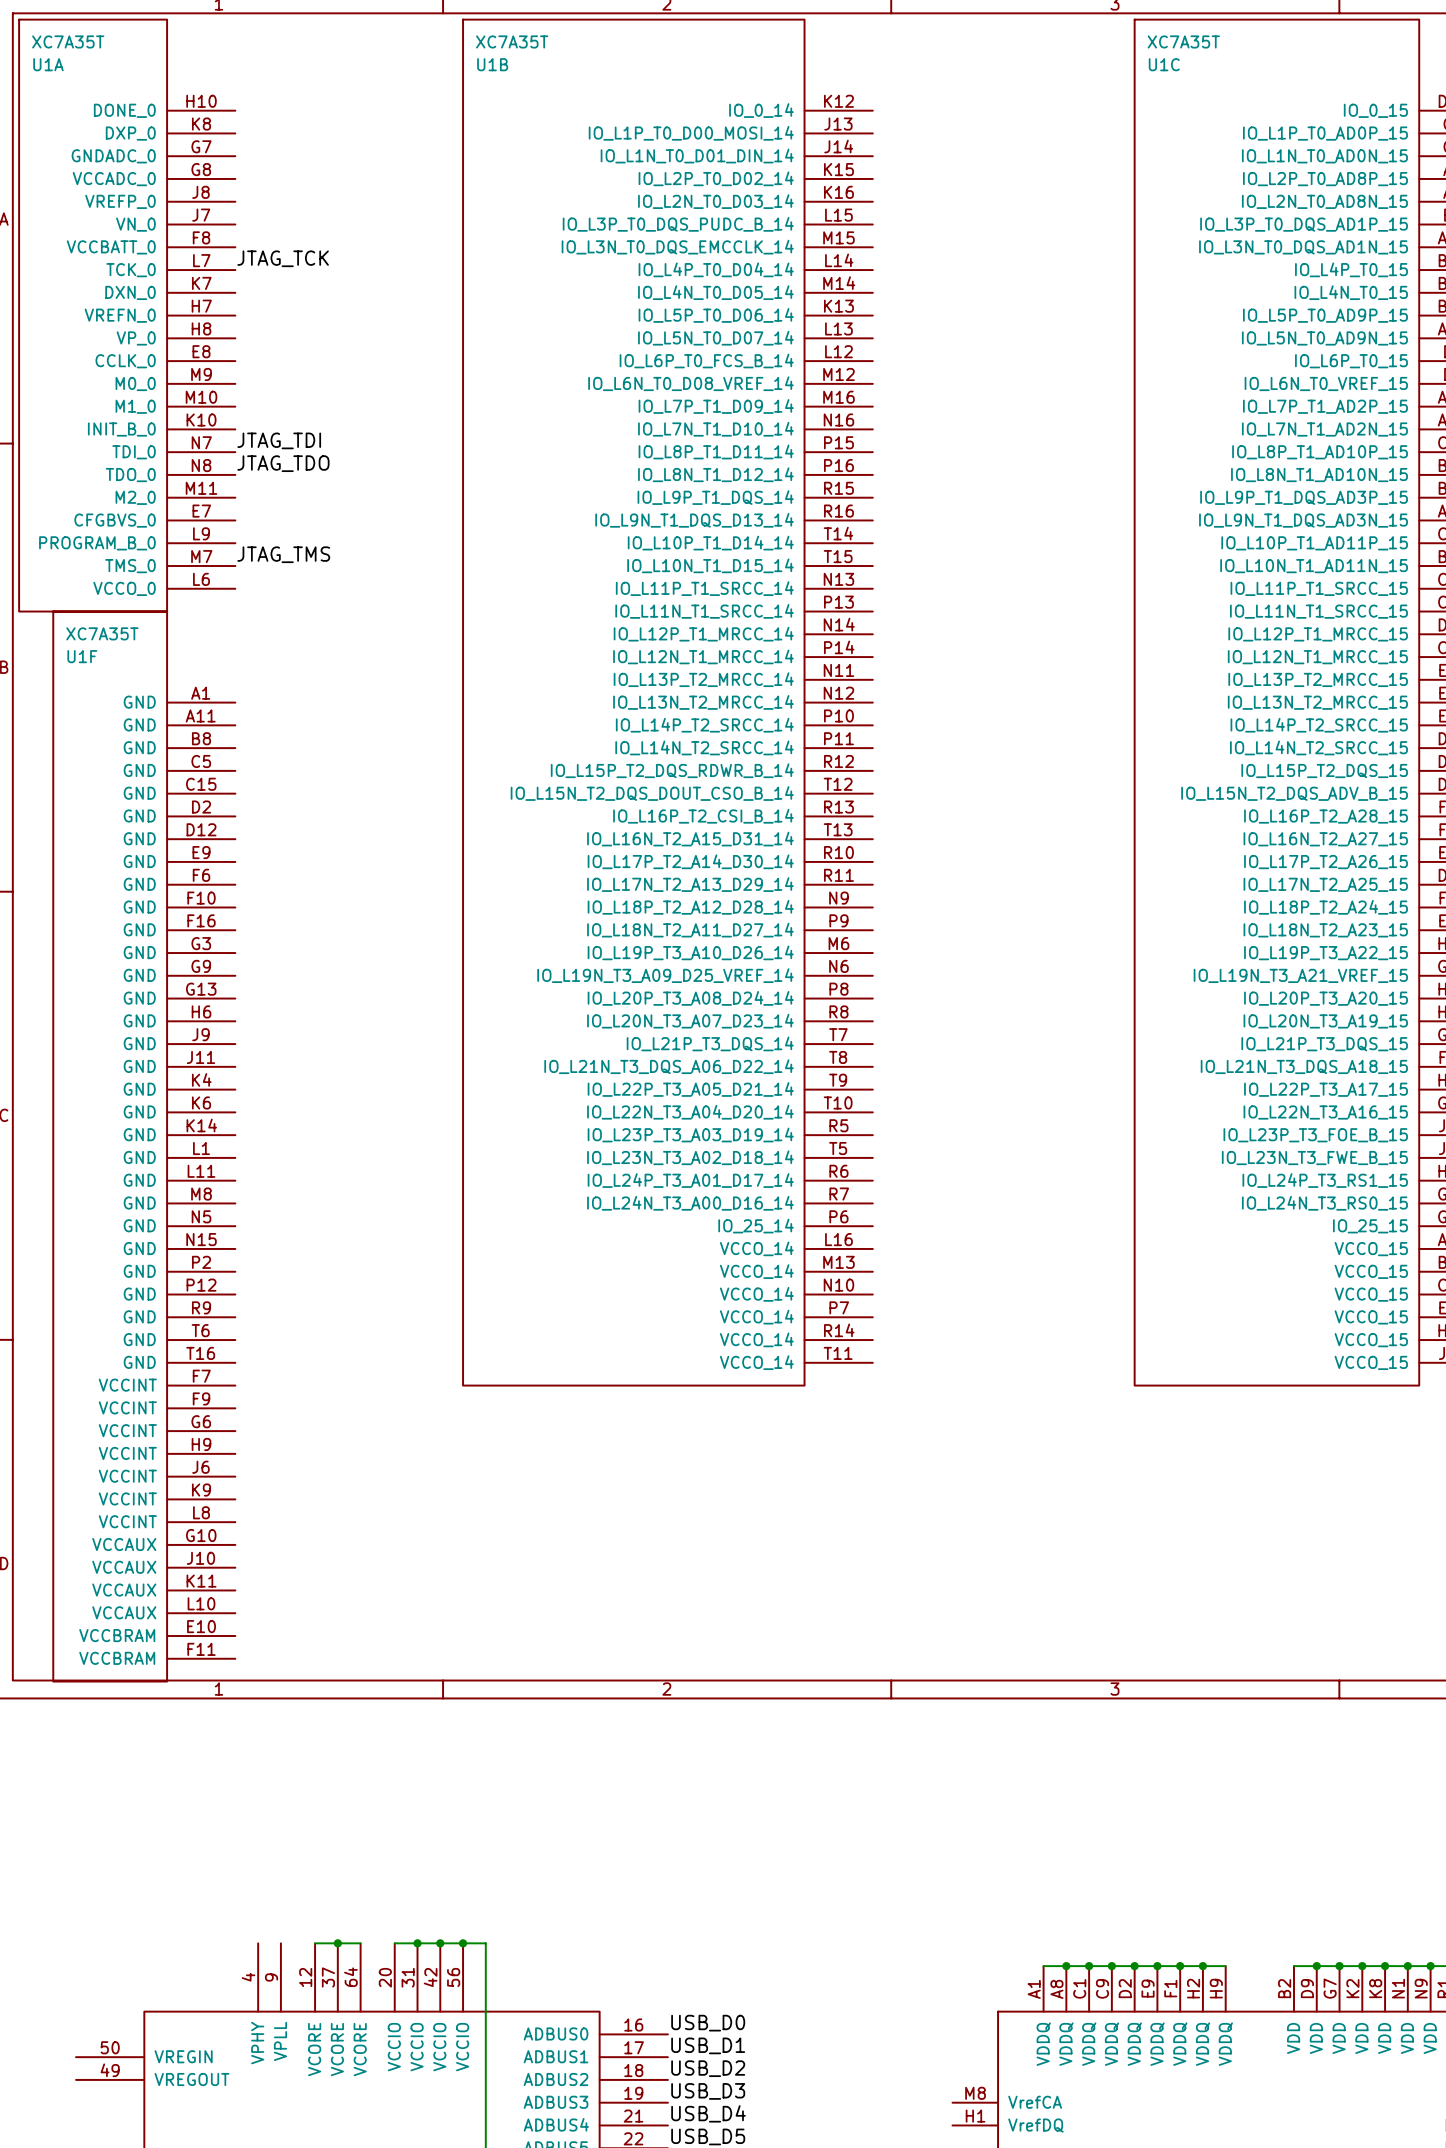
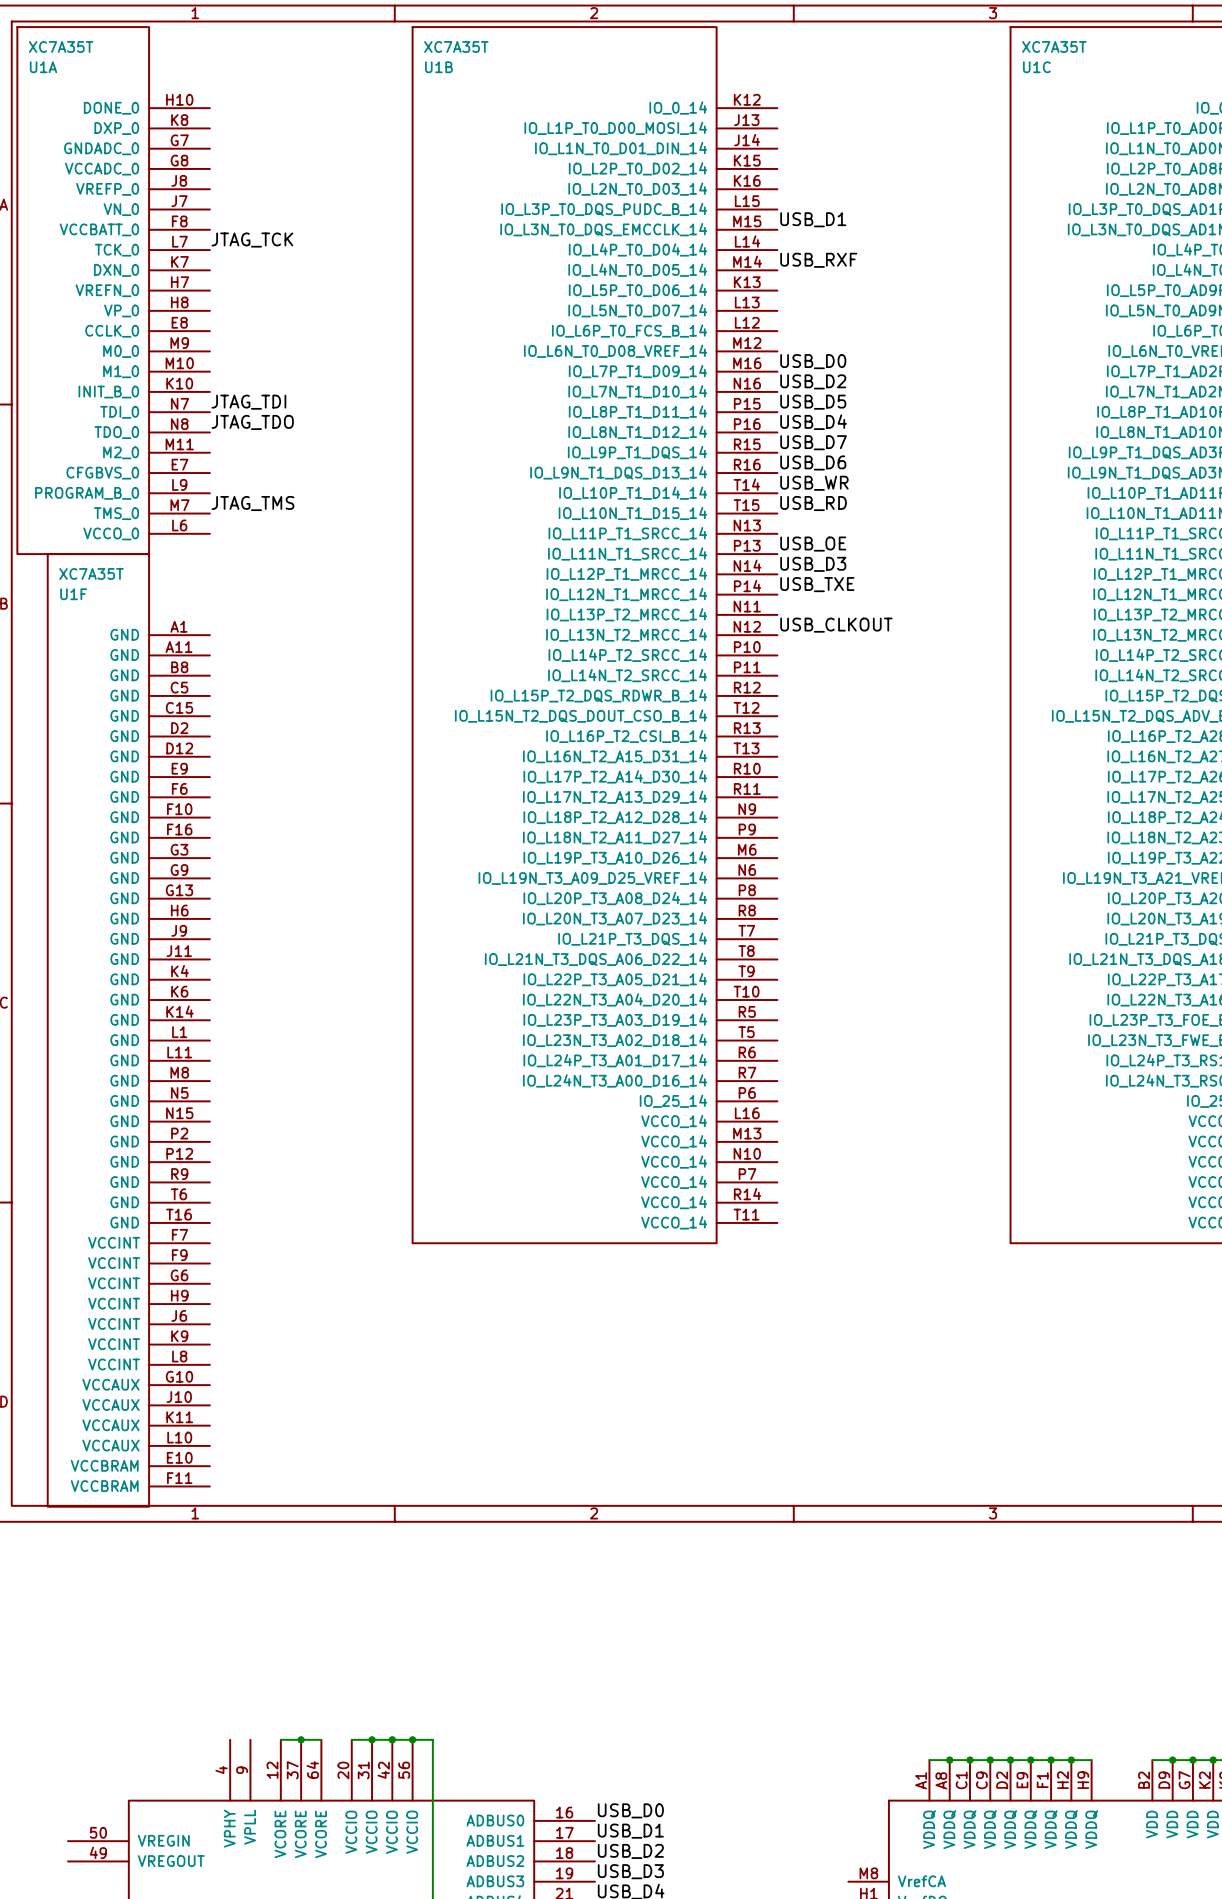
label: none -> USB_D1 (813, 219)
label: none -> USB_RXF (818, 260)
label: none -> USB_D0 (813, 361)
label: none -> USB_D2 (813, 381)
label: none -> USB_D5 (813, 402)
label: none -> USB_D4 (813, 422)
label: none -> USB_D7 (813, 442)
label: none -> USB_D6 (813, 462)
label: none -> USB_WR (814, 483)
label: none -> USB_RD (813, 503)
label: none -> USB_OE (813, 544)
label: none -> USB_D3 (813, 564)
label: none -> USB_TXE (817, 584)
label: none -> USB_CLKOUT (836, 625)

